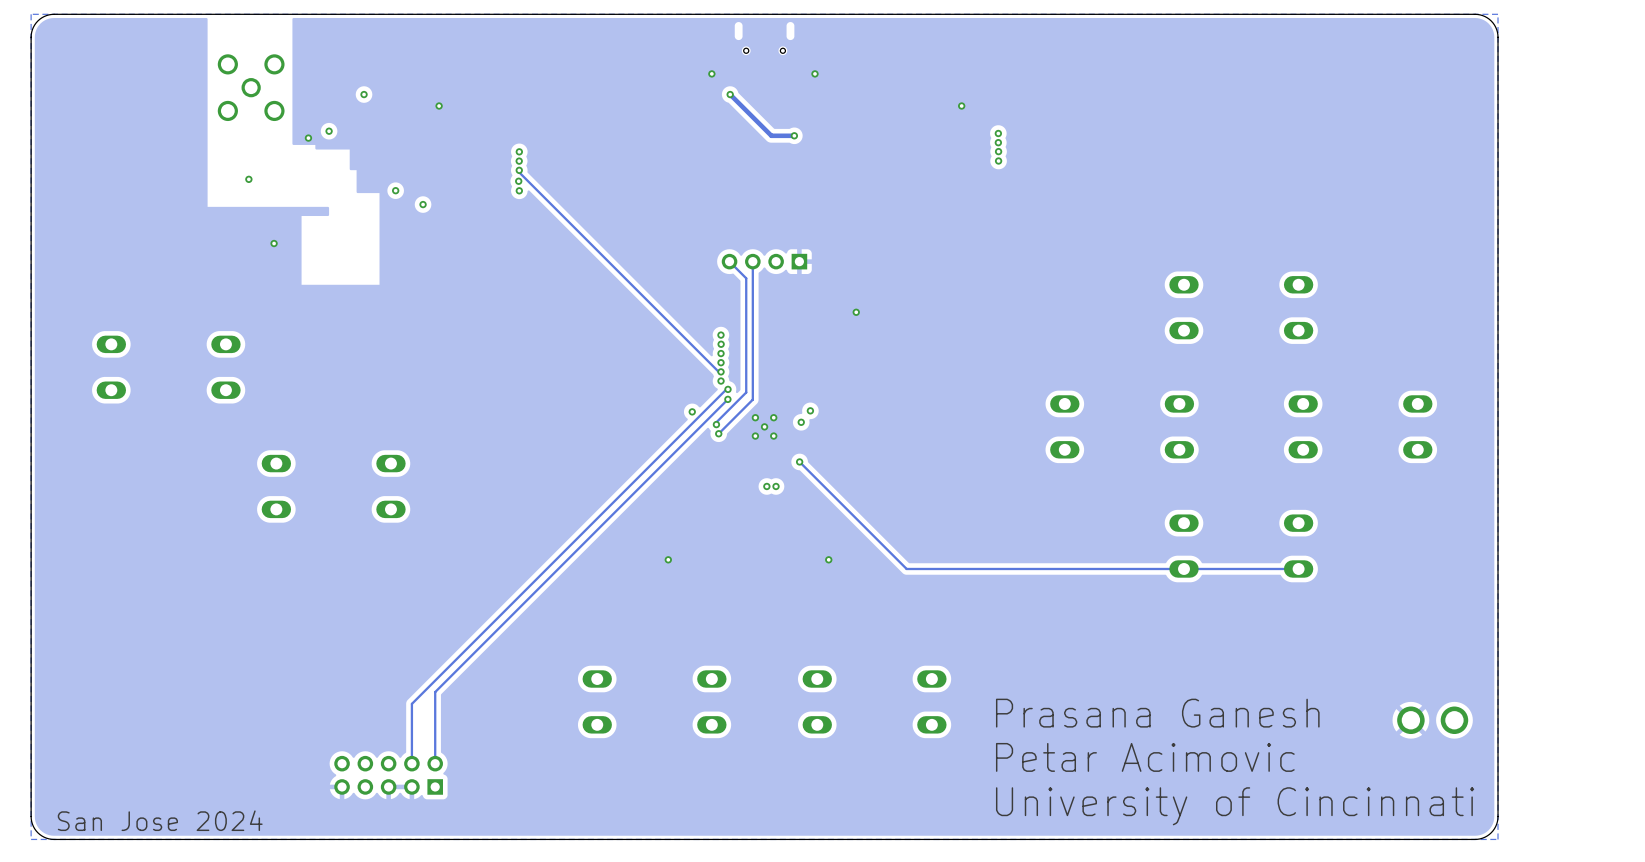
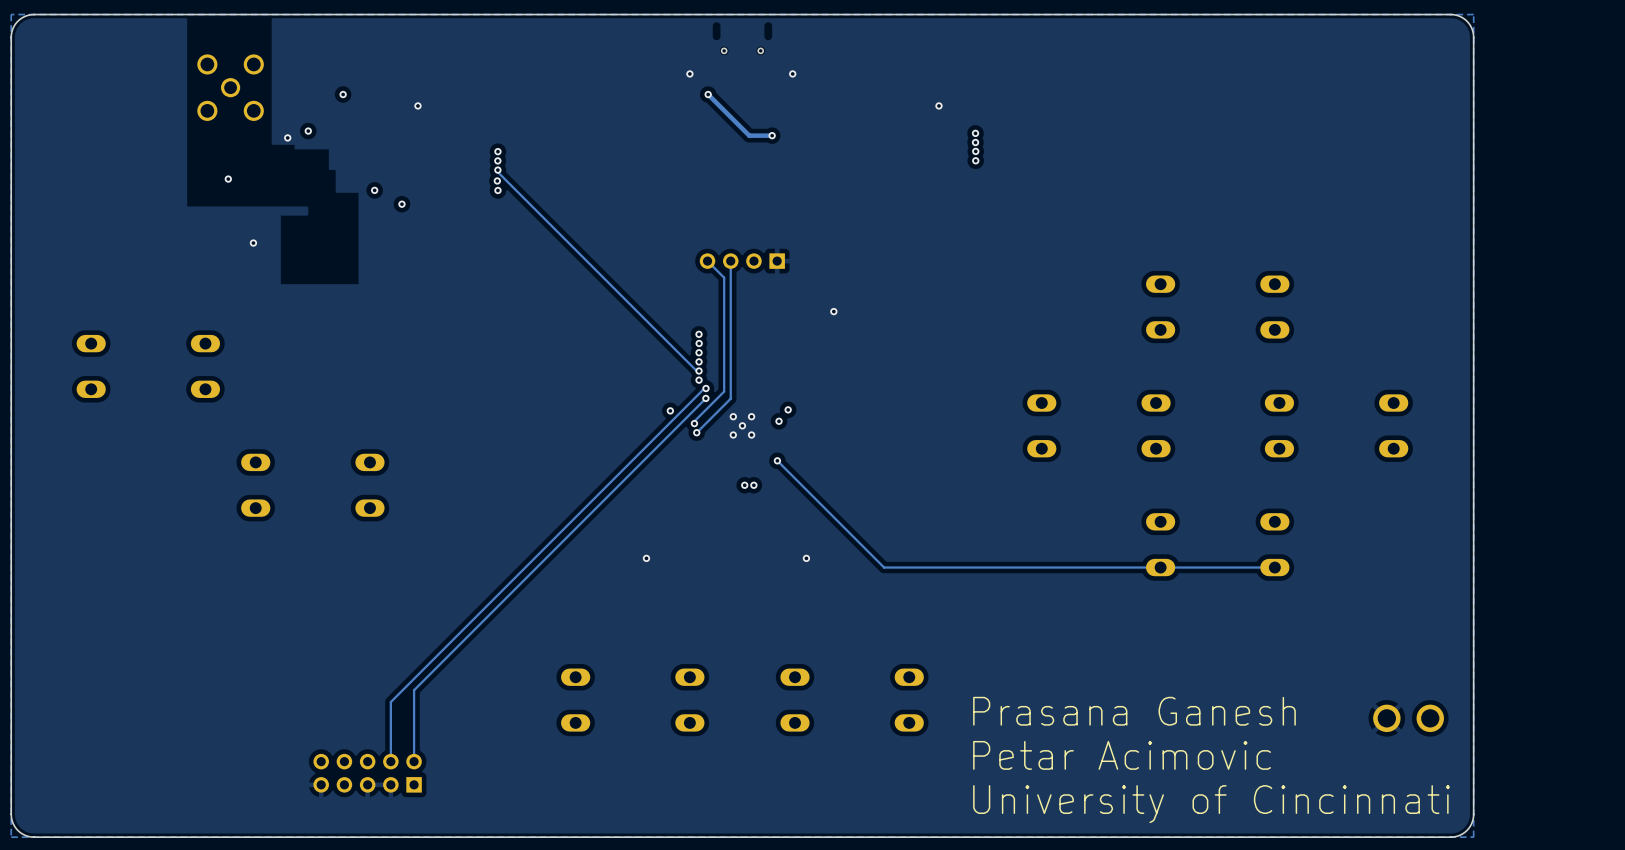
text: San Jose 2024 (160, 820) -> none

